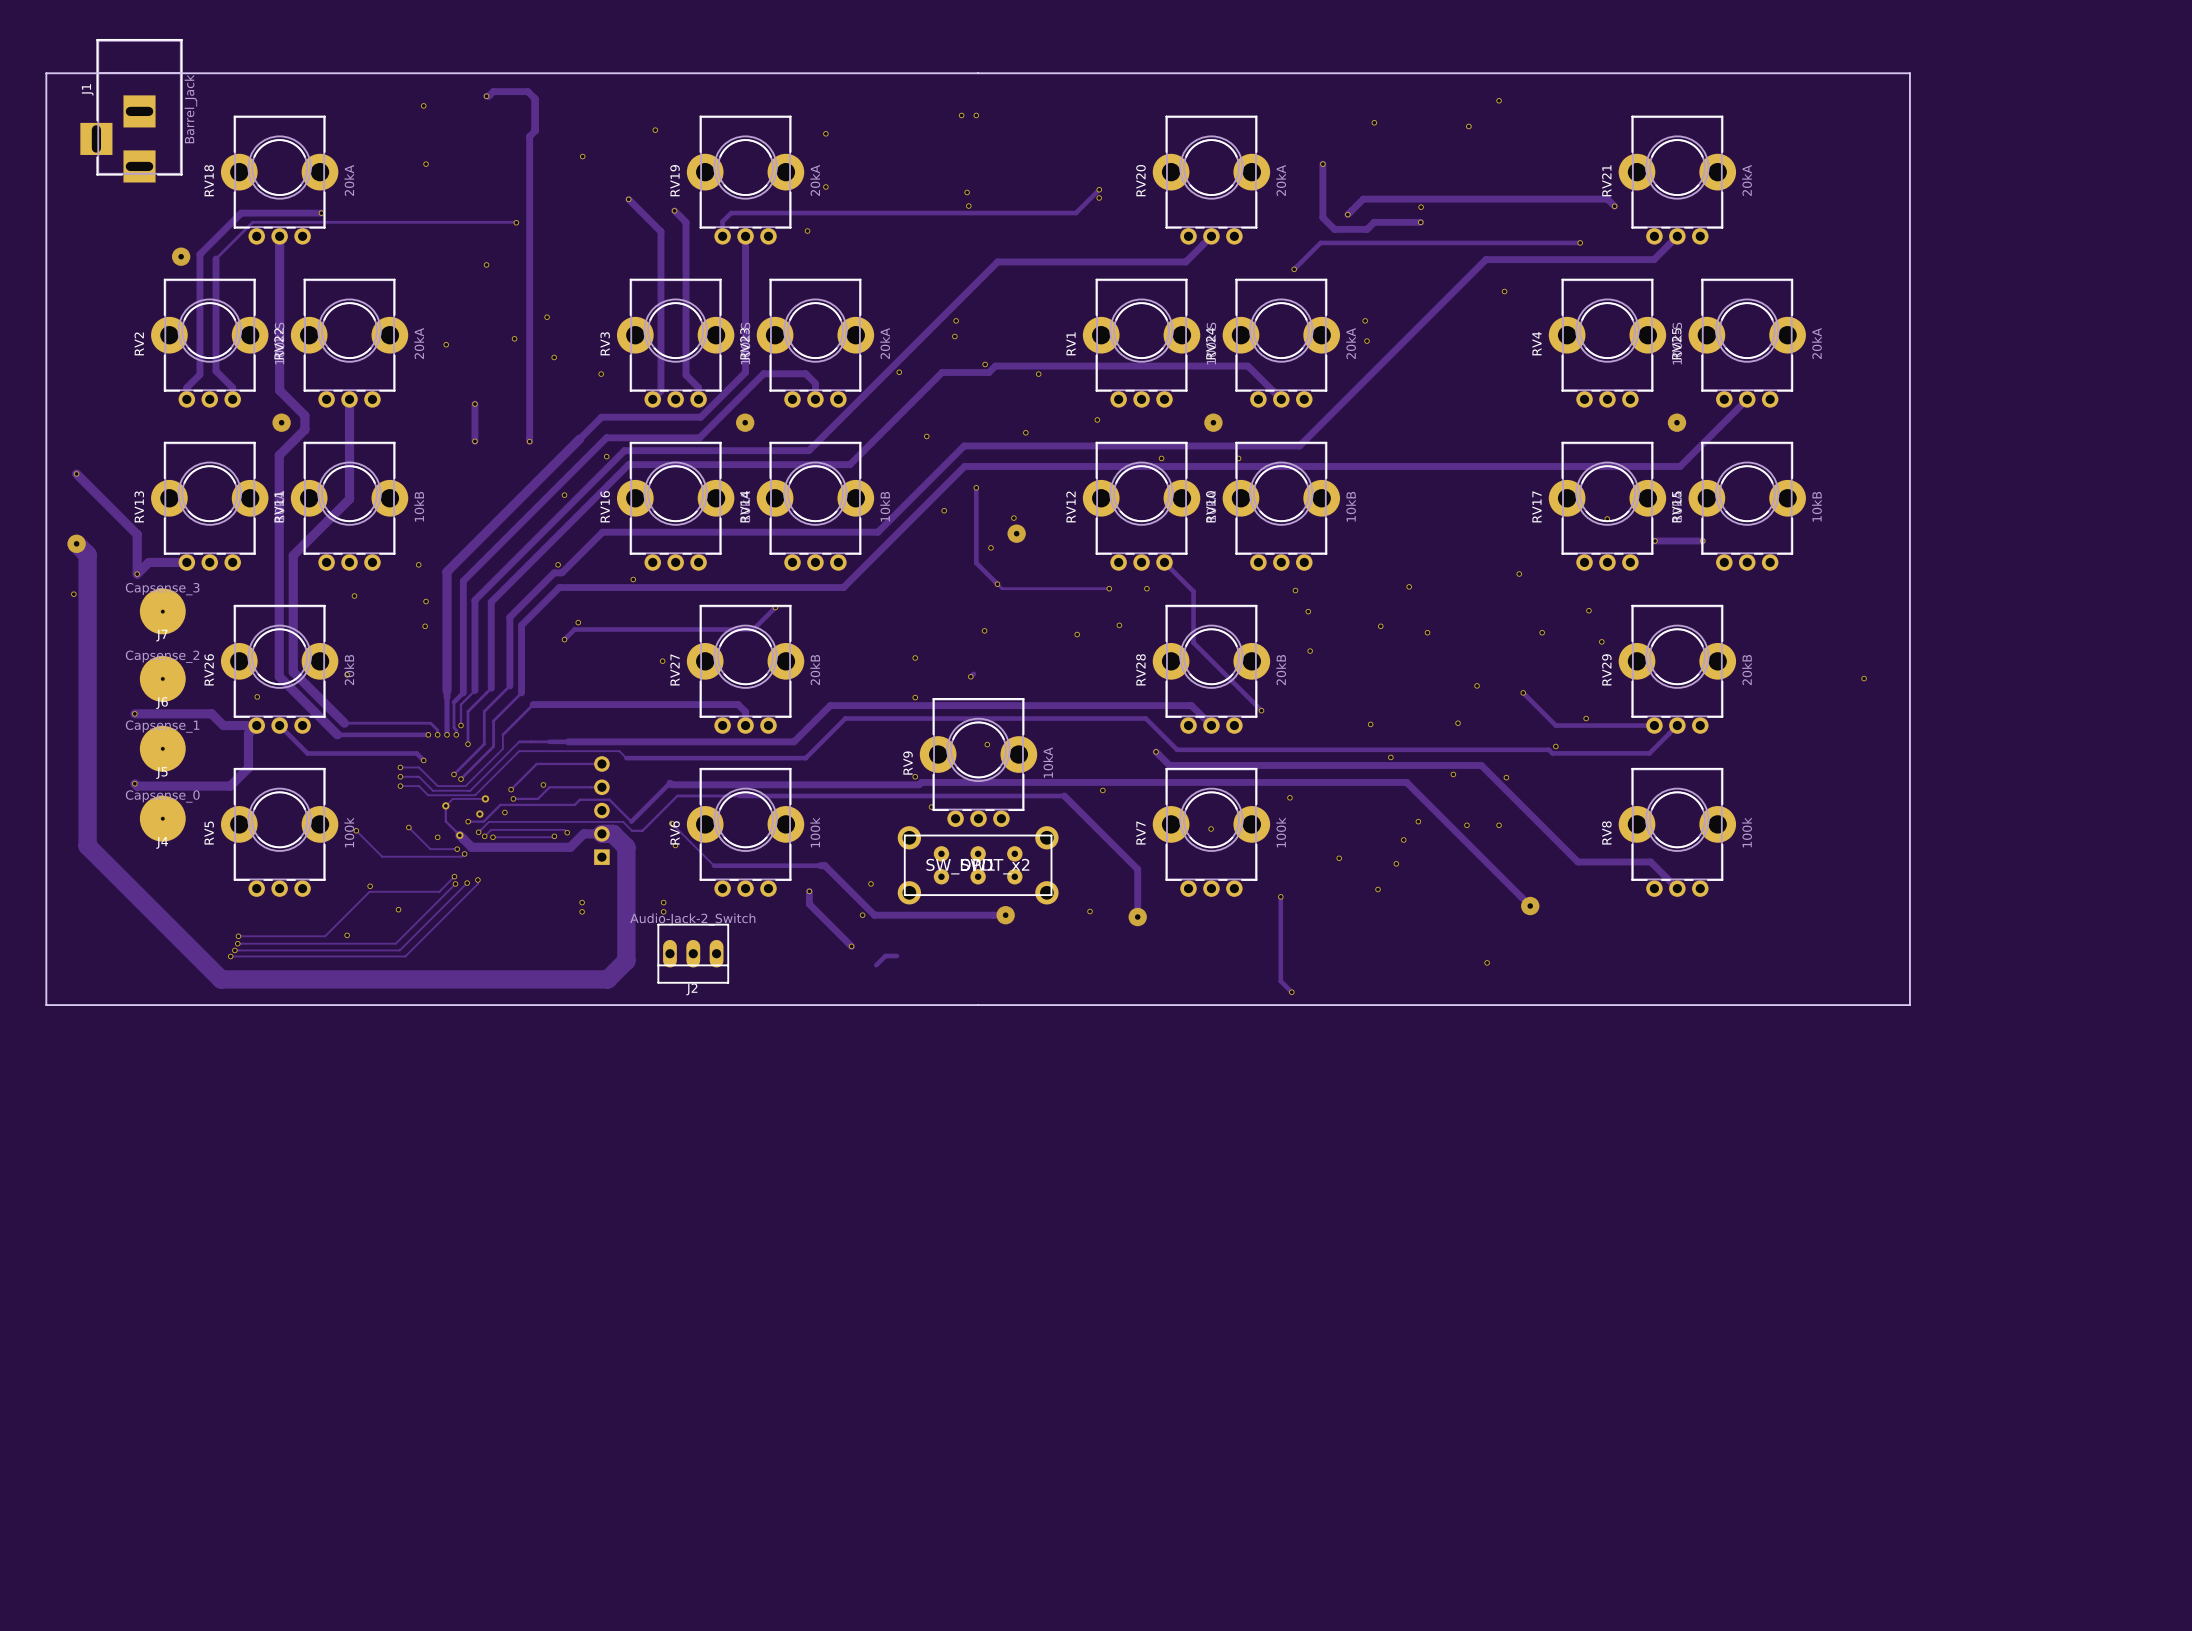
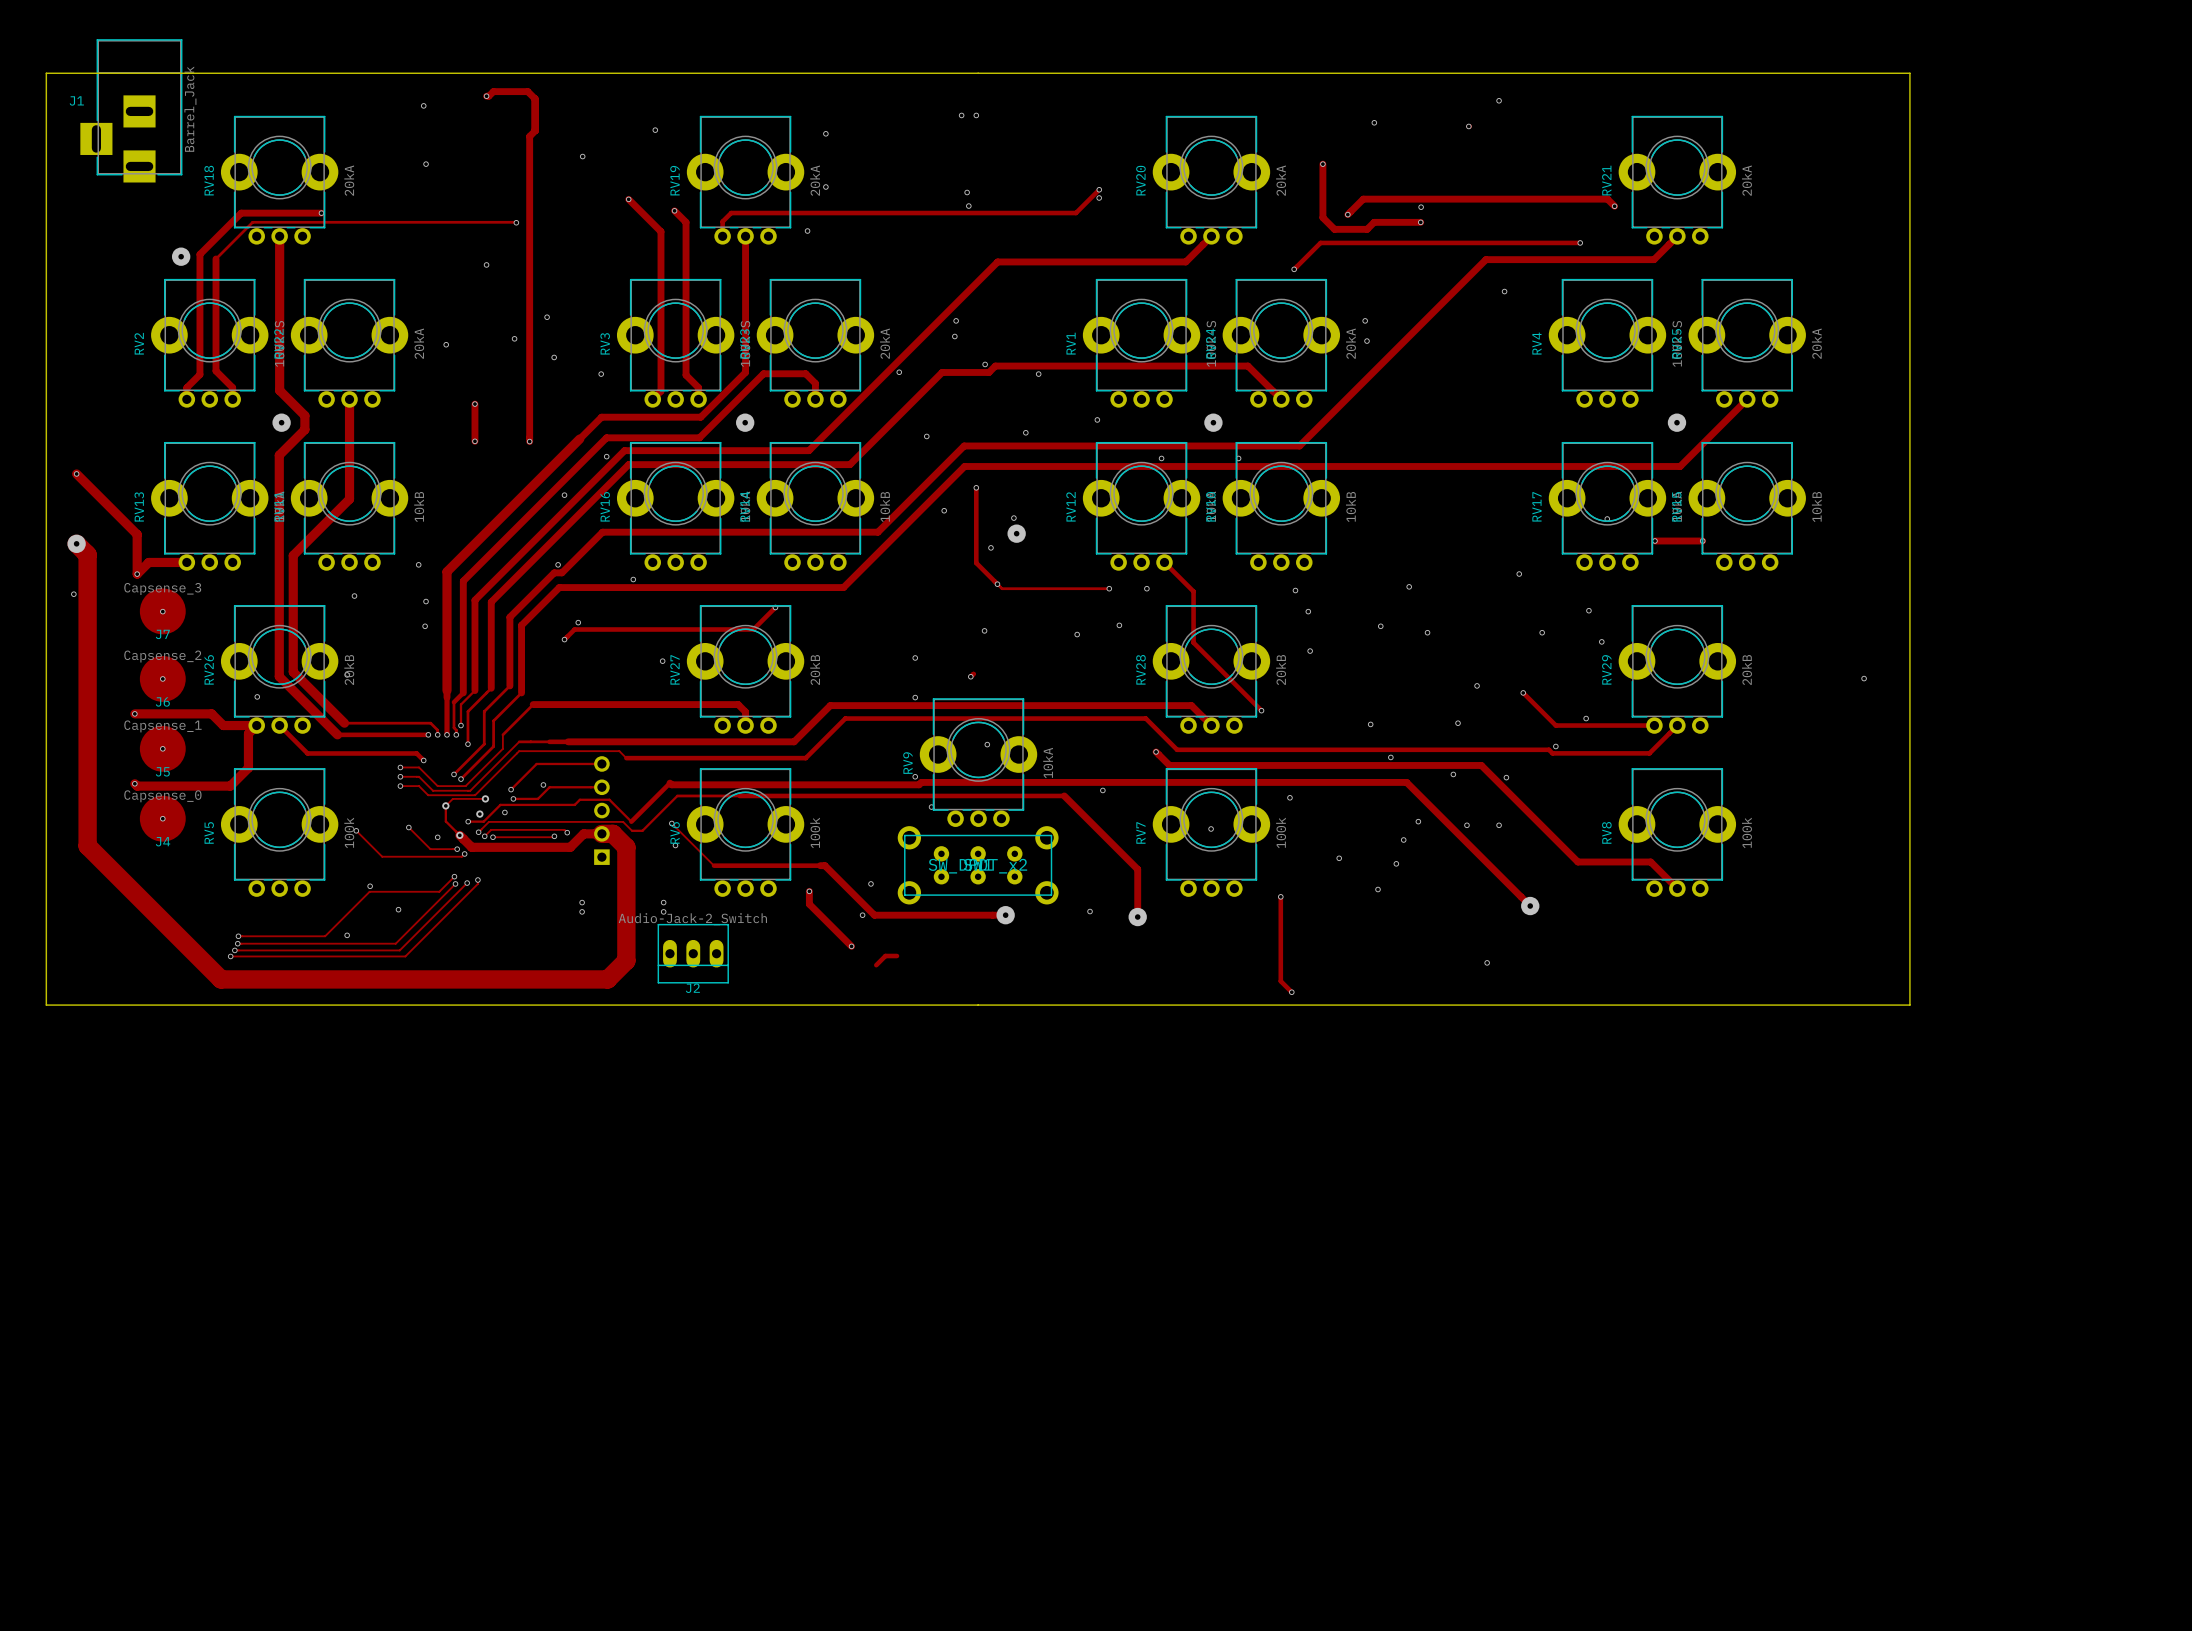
J1 name rotation: 0° (87, 89) -> 90° clockwise (76, 100)

